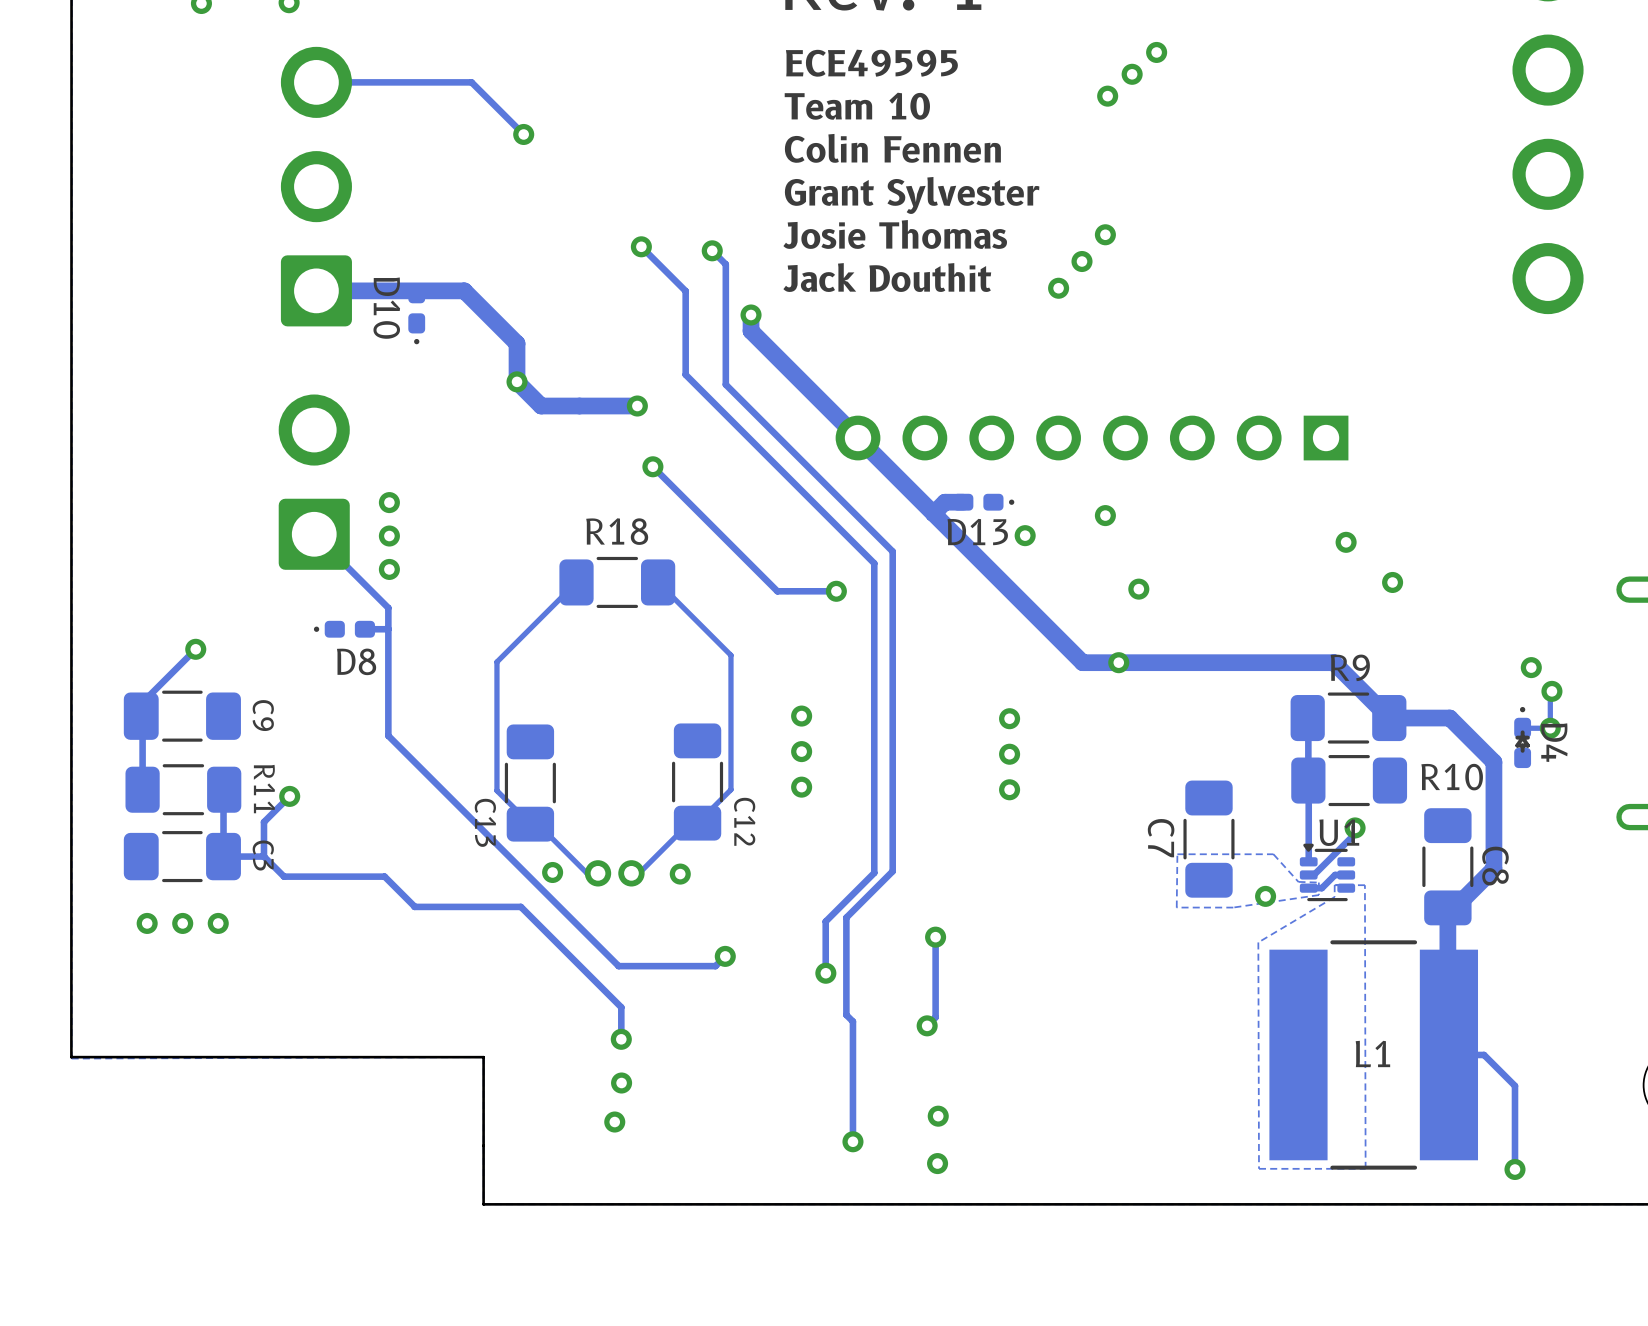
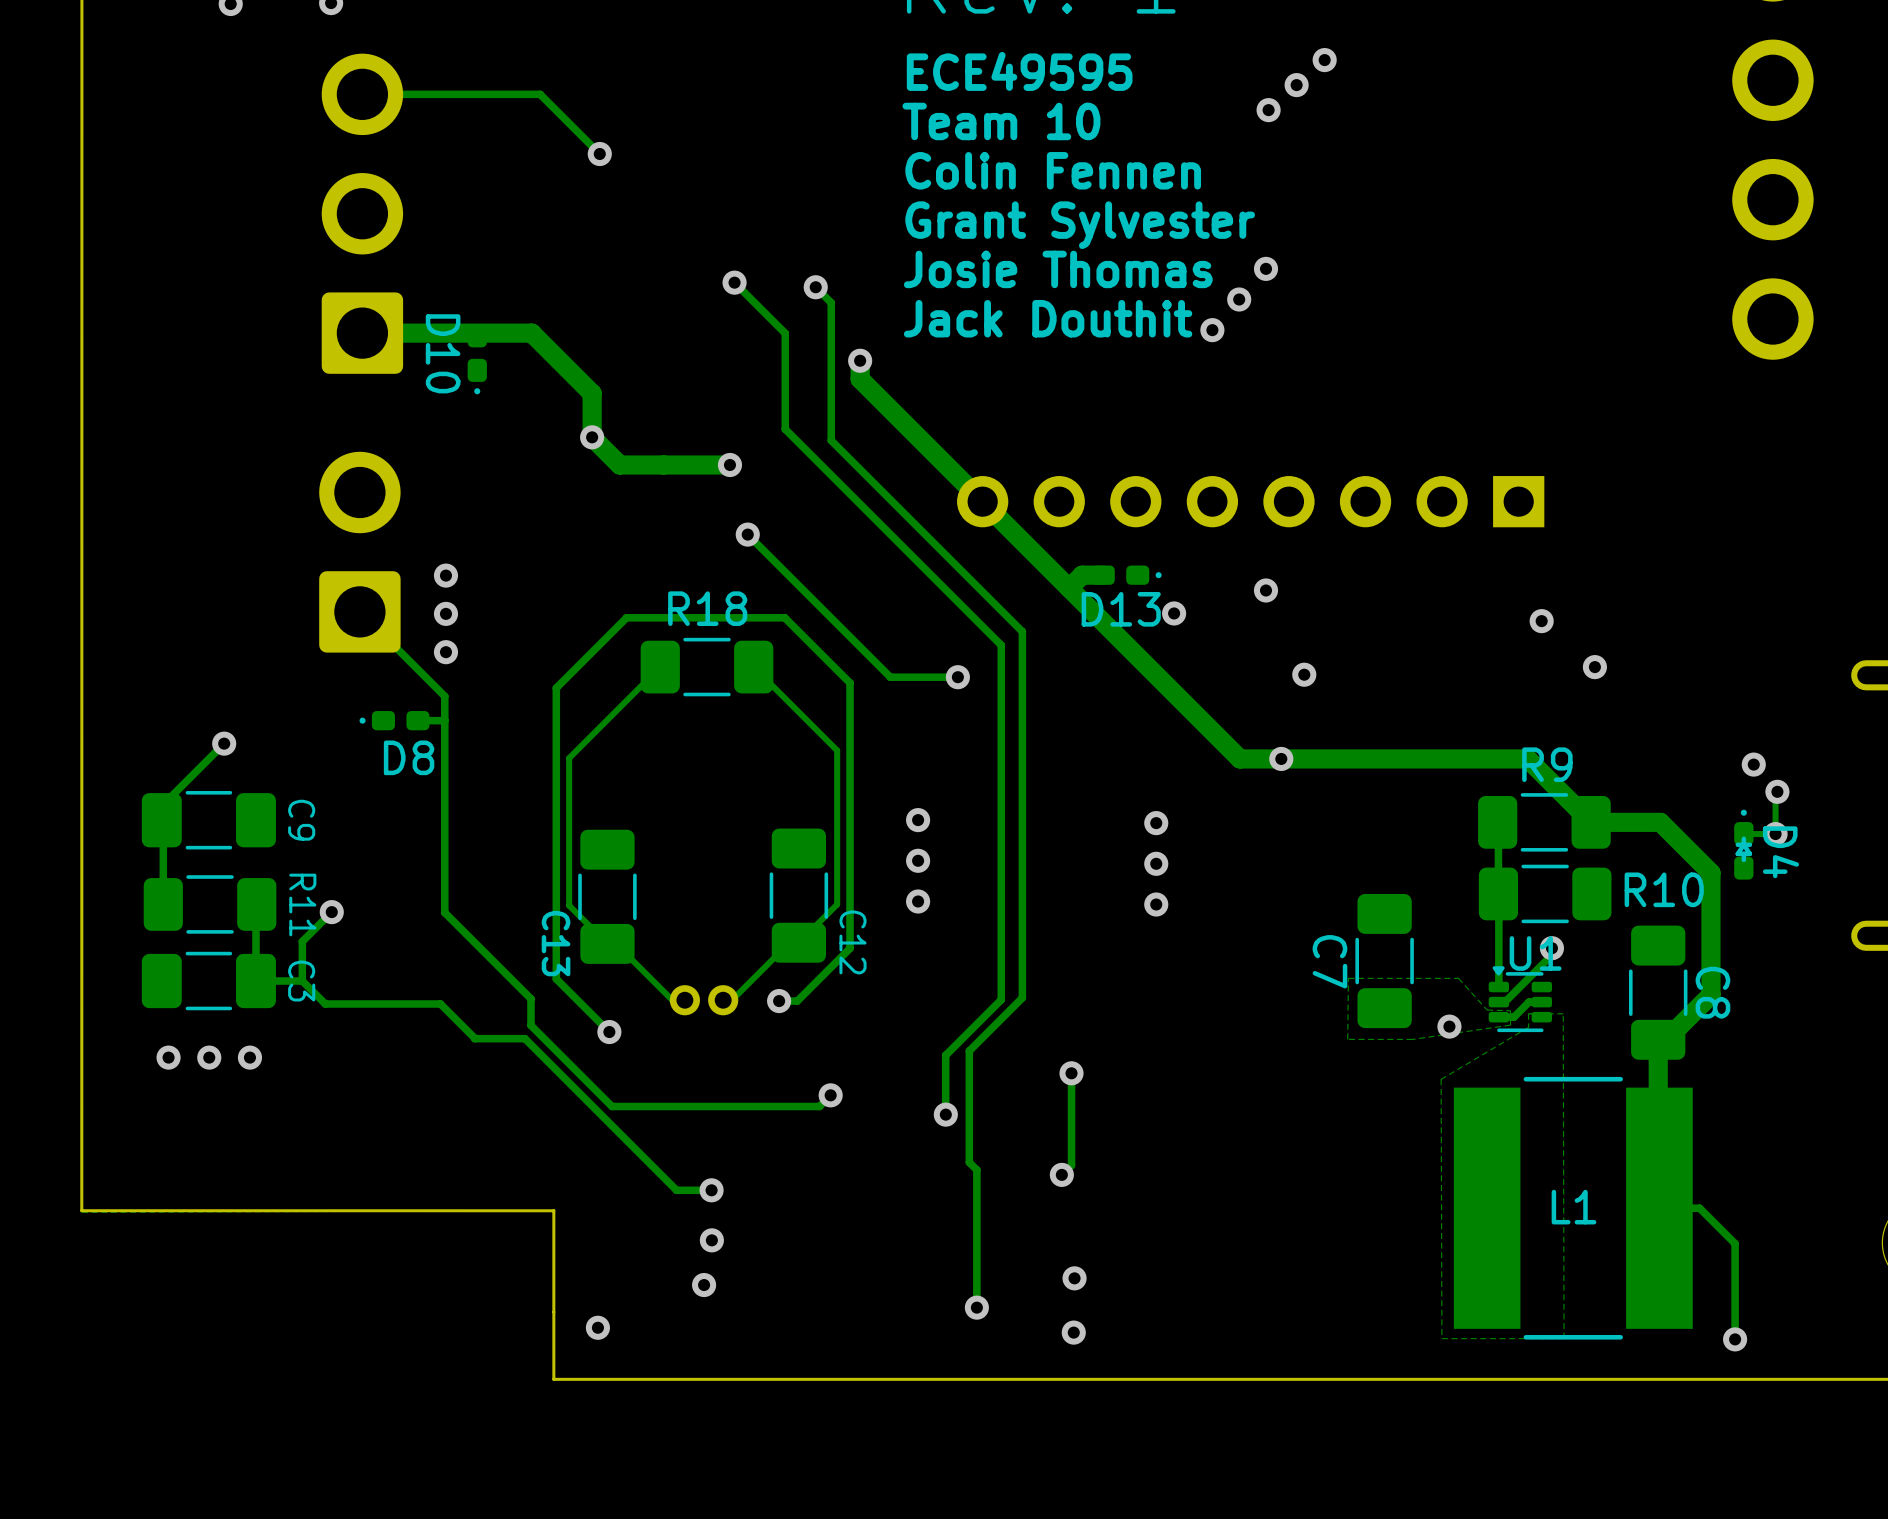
track: (388, 735) (618, 966) -> (444, 842) (444, 912) (530, 998) (530, 1025) (612, 1106) (708, 1106)
via position: (552, 872) -> (609, 1032)
track: none -> (779, 1001) (797, 1001) (850, 948) (850, 682) (784, 617) (626, 617) (556, 688) (556, 978) (609, 1032)
track: (458, 906) (520, 906) (621, 1007) (621, 1039) -> (524, 1038) (676, 1190) (711, 1190)
via: none -> (597, 1327)

